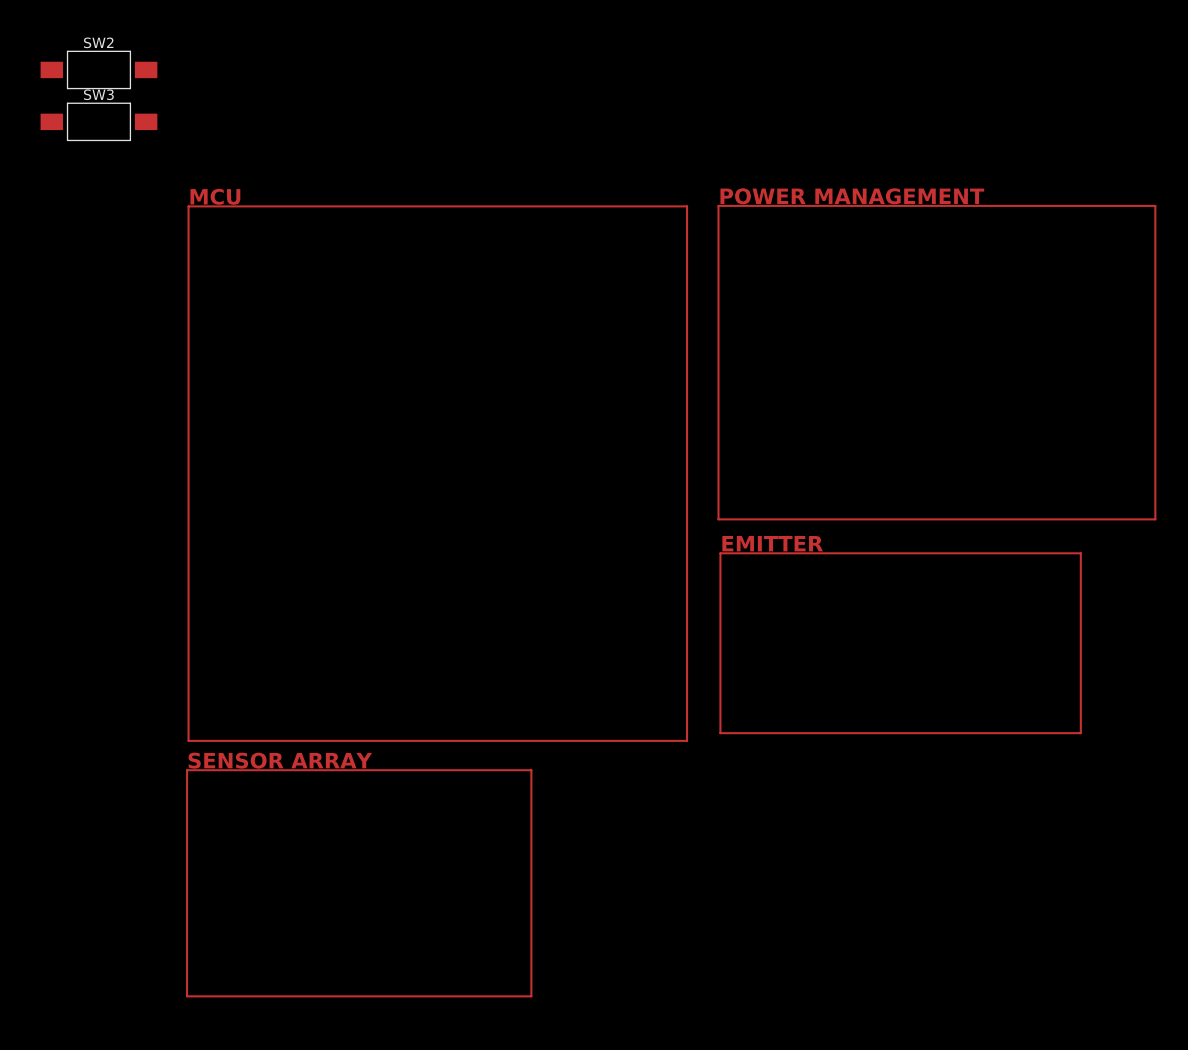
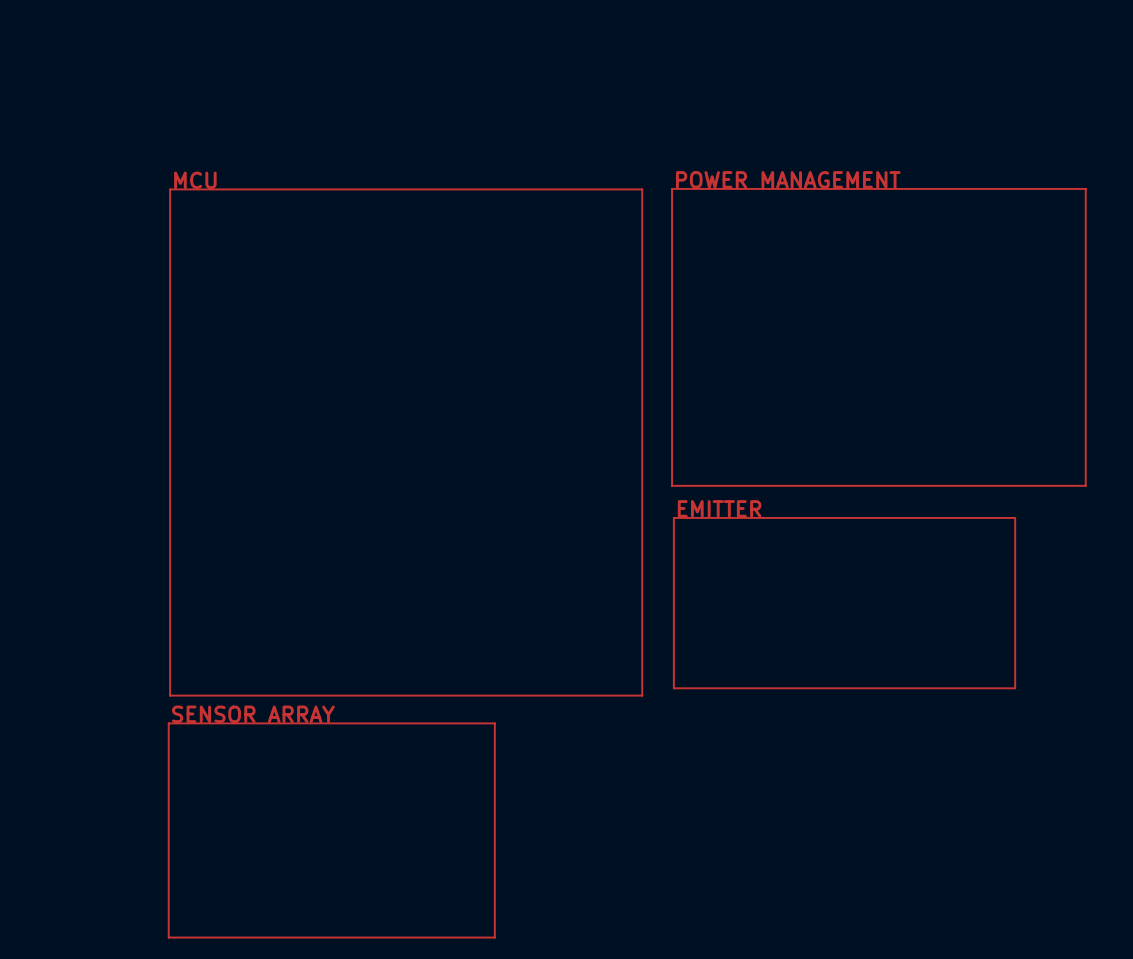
SW2: (98, 69) -> none
SW3: (98, 121) -> none

